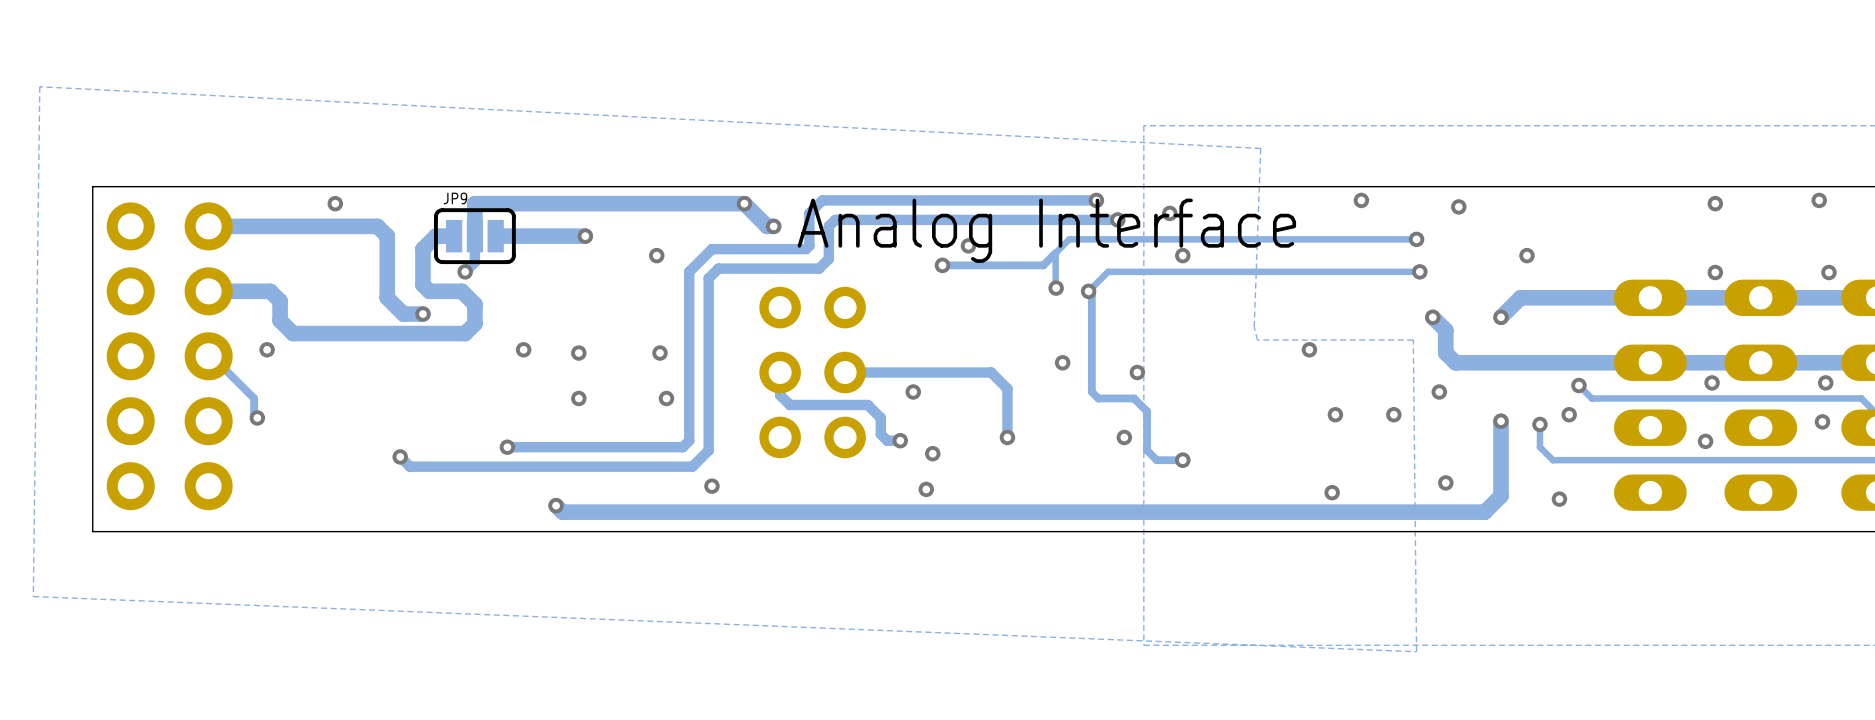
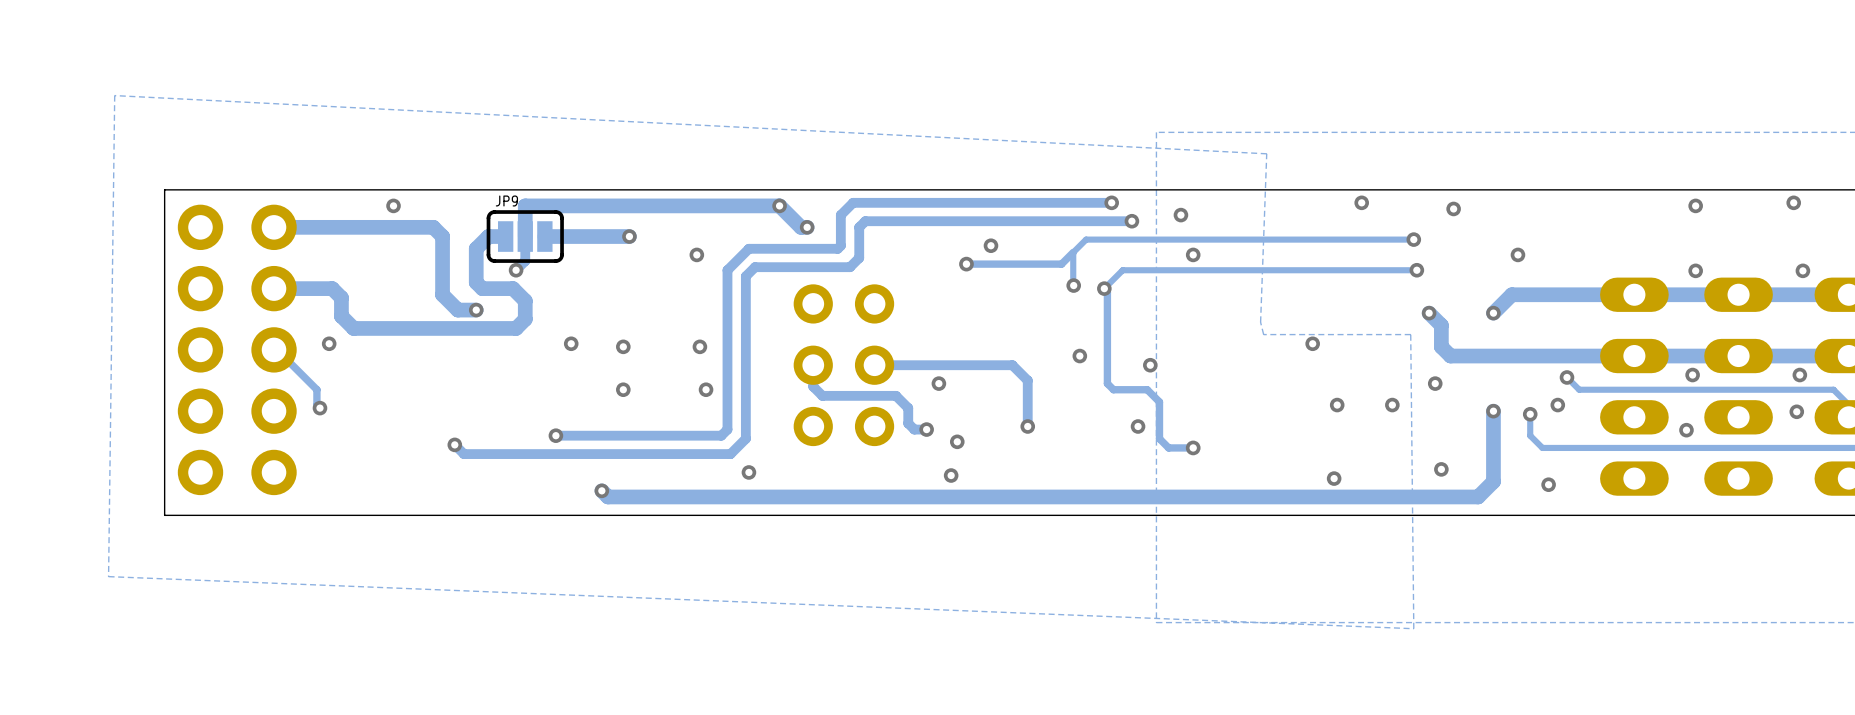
text: Analog Interface (1046, 230) -> none

